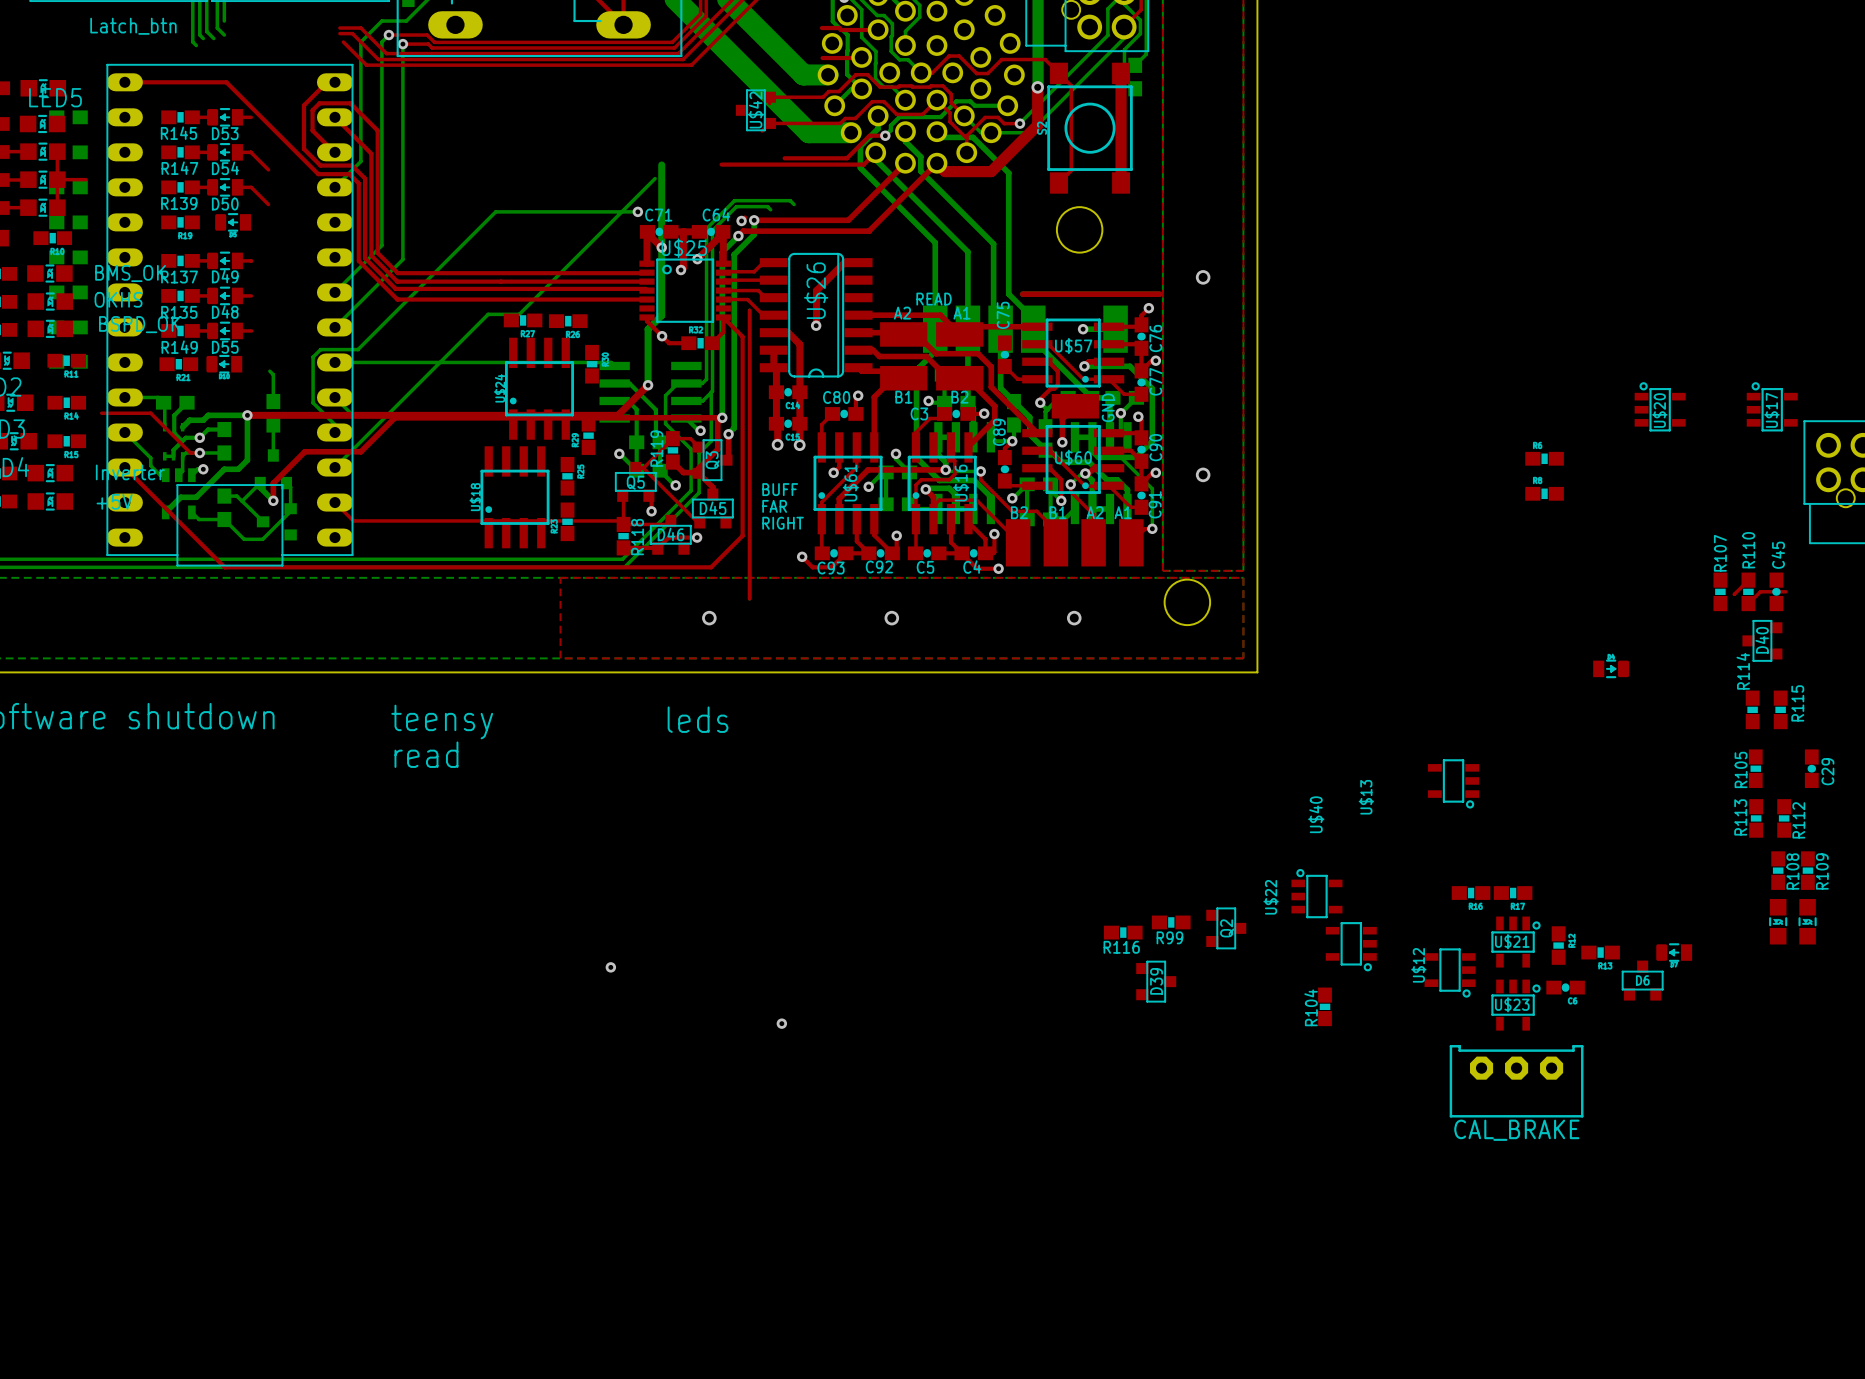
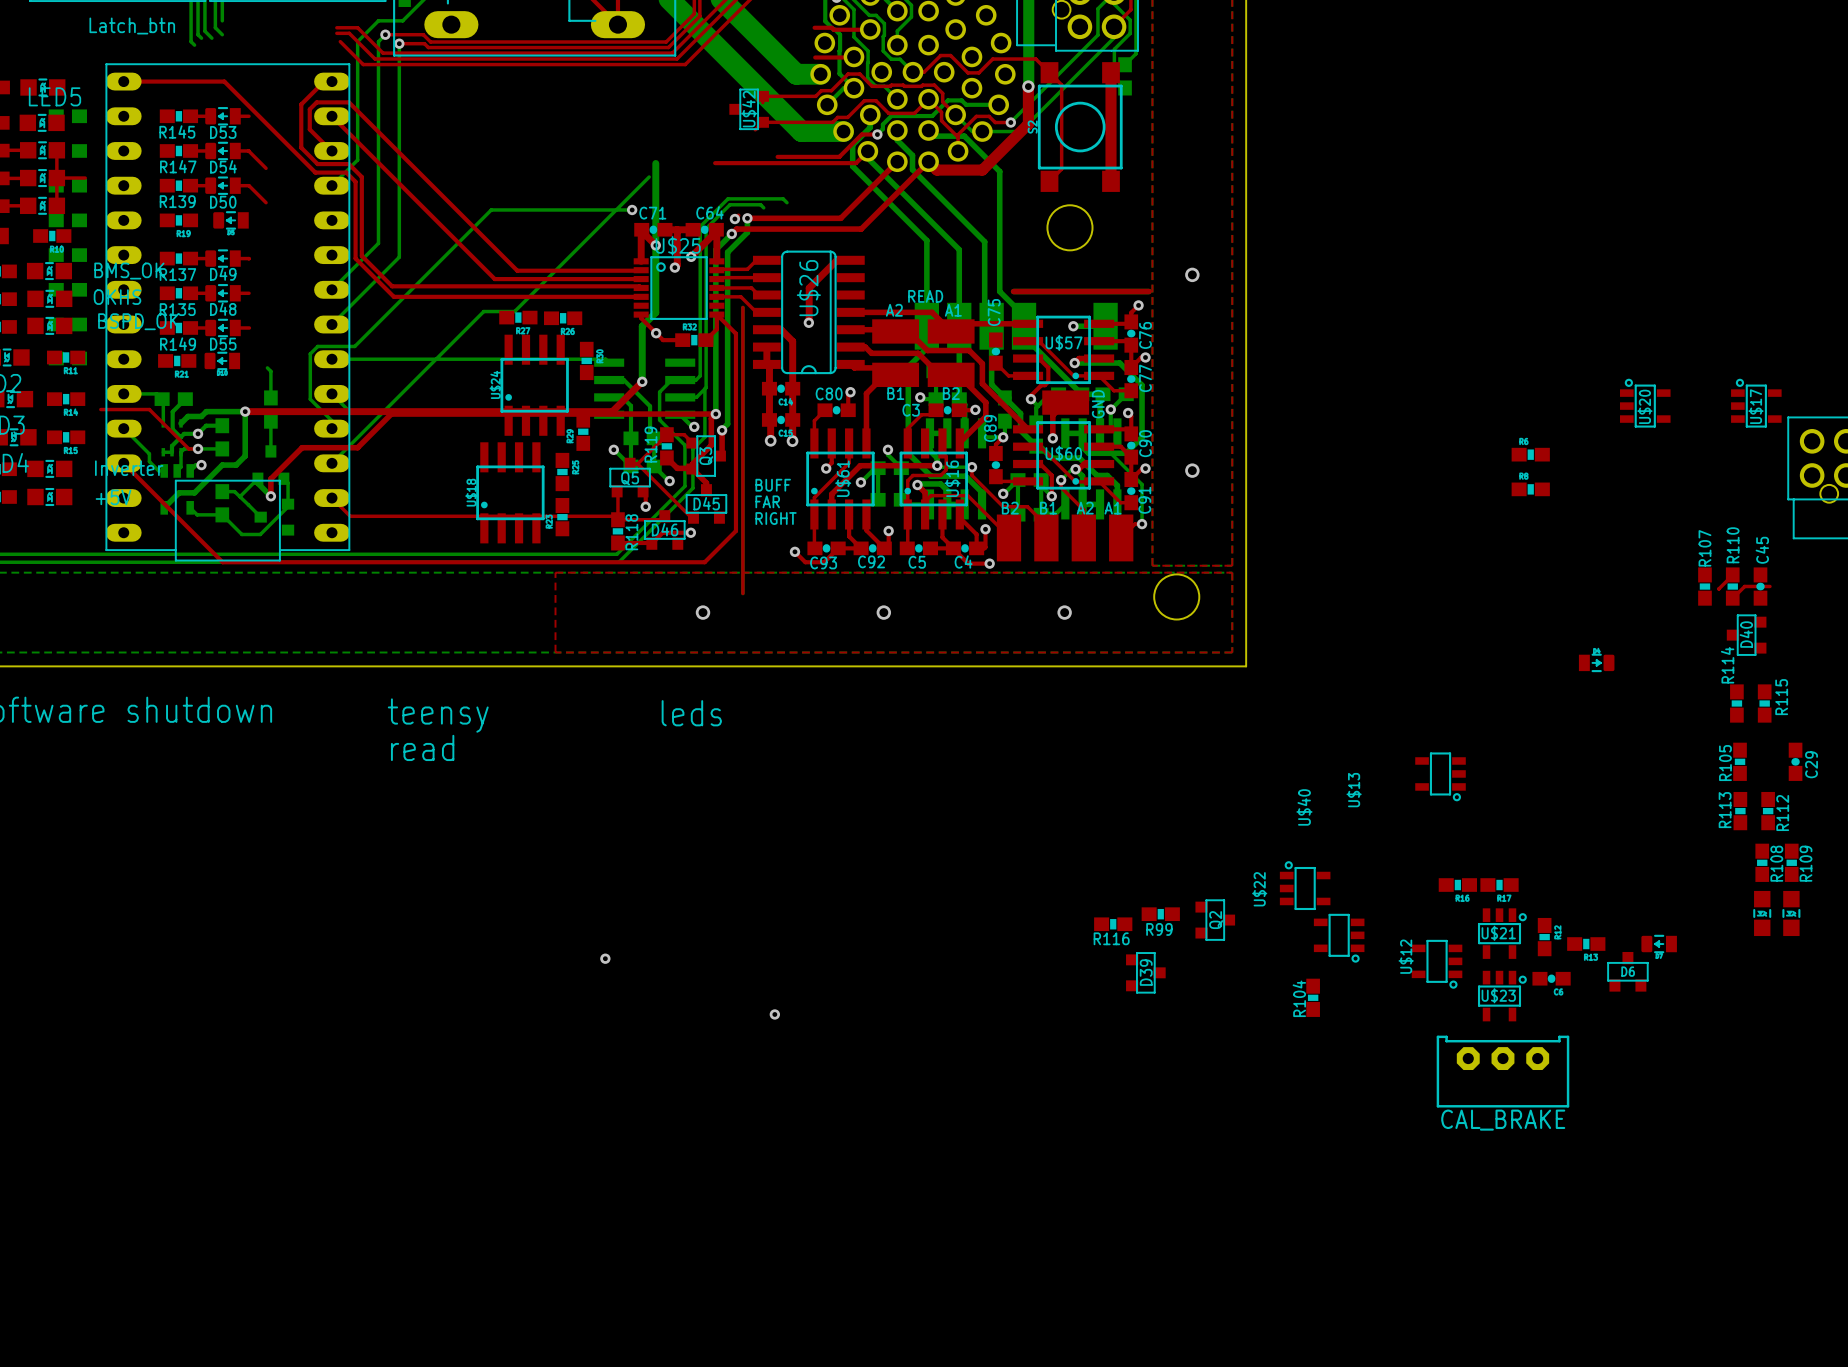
top track: (350, 103) (377, 130) (377, 253) (397, 273) (521, 273) -> (348, 102) (517, 270)
top track: (371, 153) (371, 255) (397, 281) (499, 281) -> (368, 152) (494, 279)

